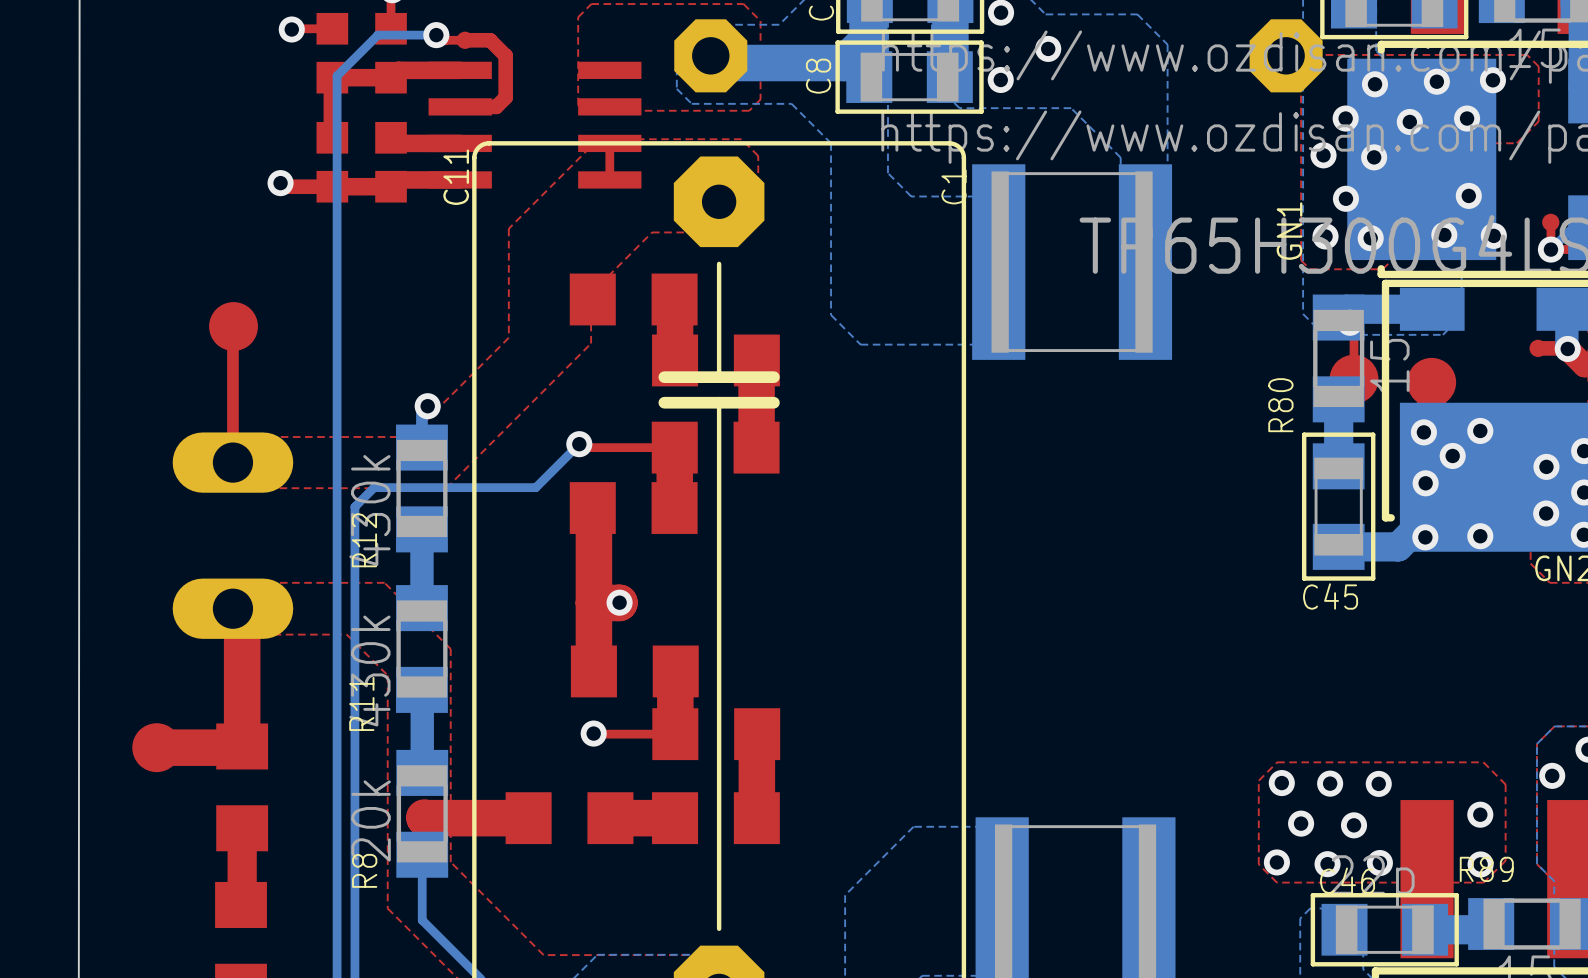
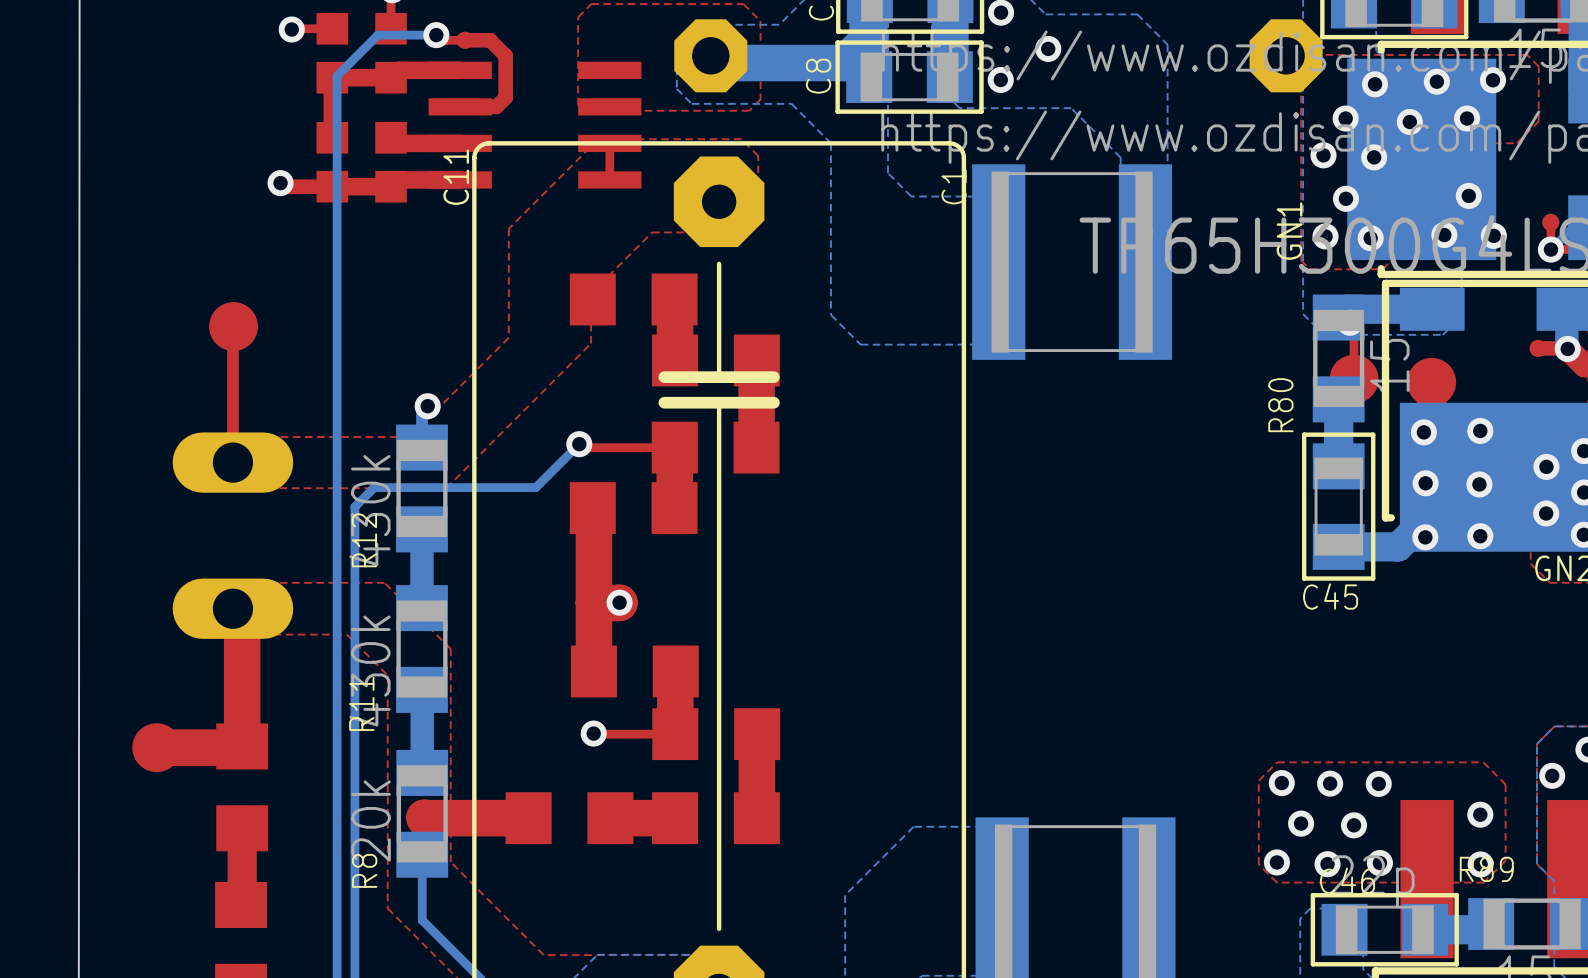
via position: (1452, 455) -> (1479, 484)

